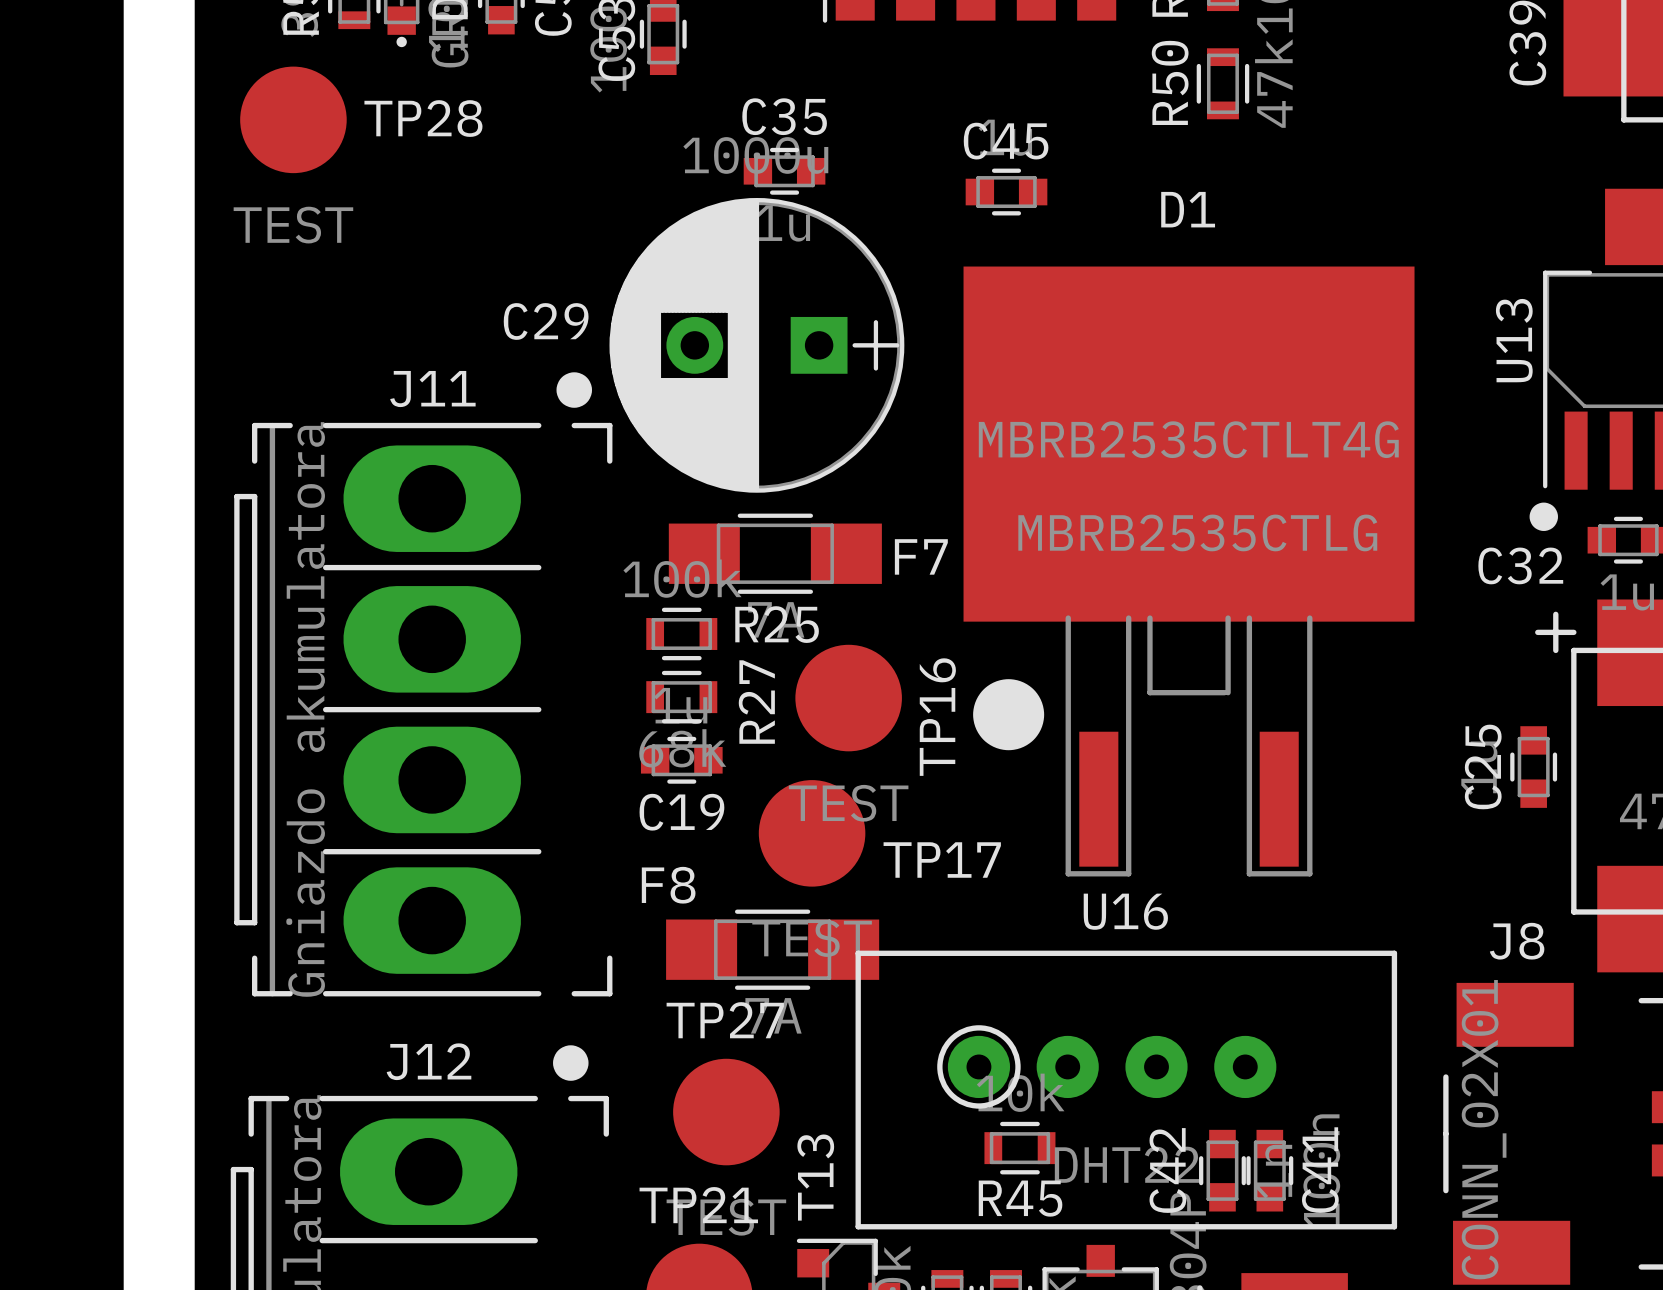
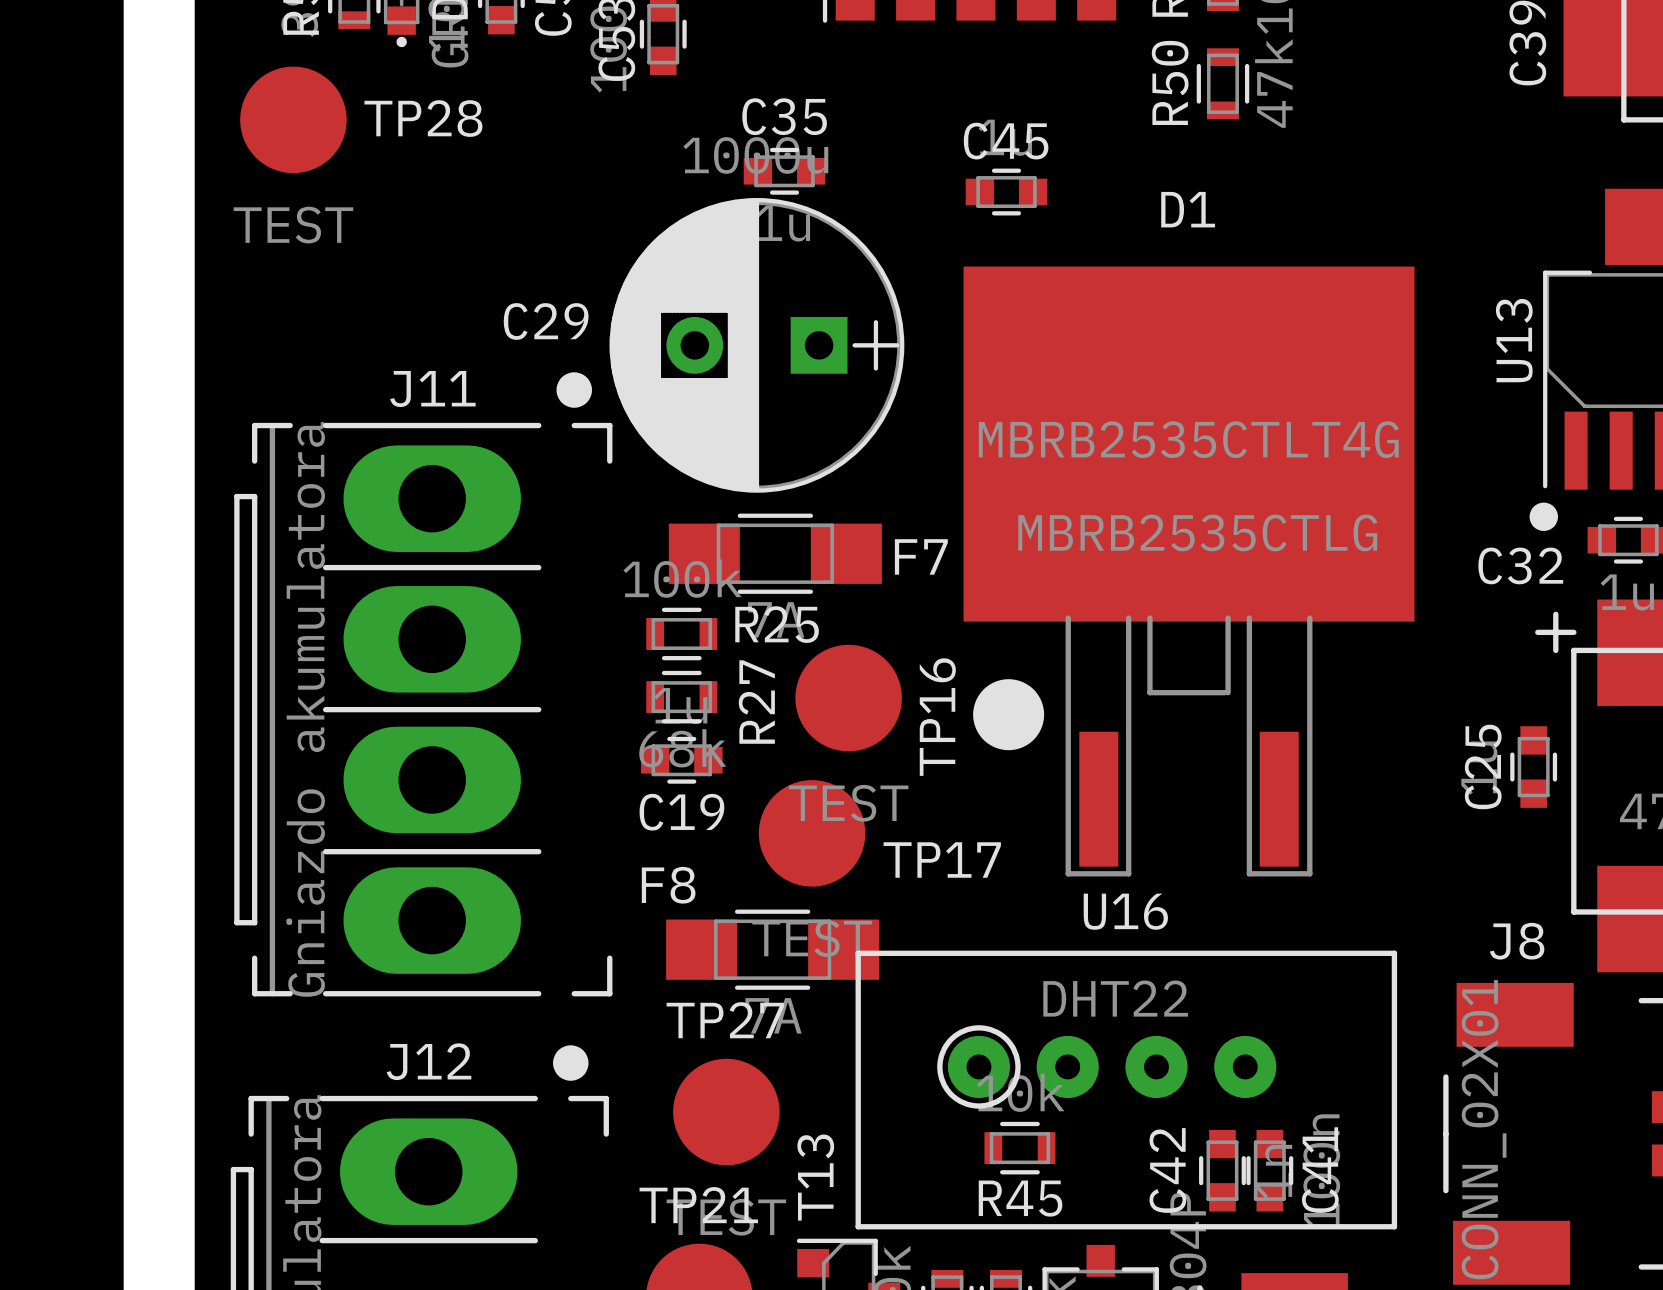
U16 value position: DHT22 (1127, 1164) -> DHT22 (1115, 998)

